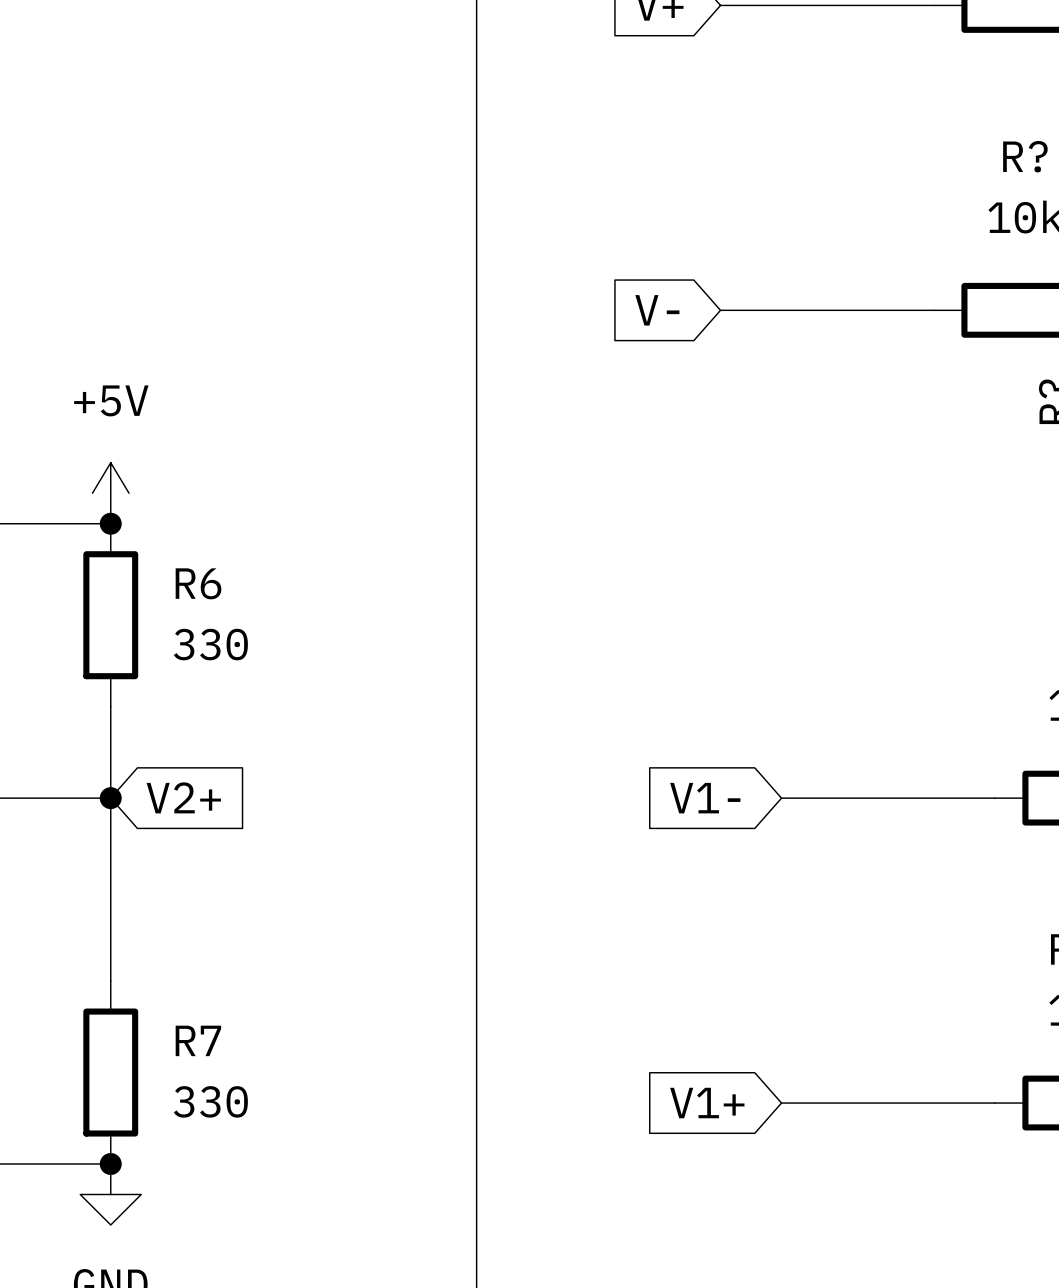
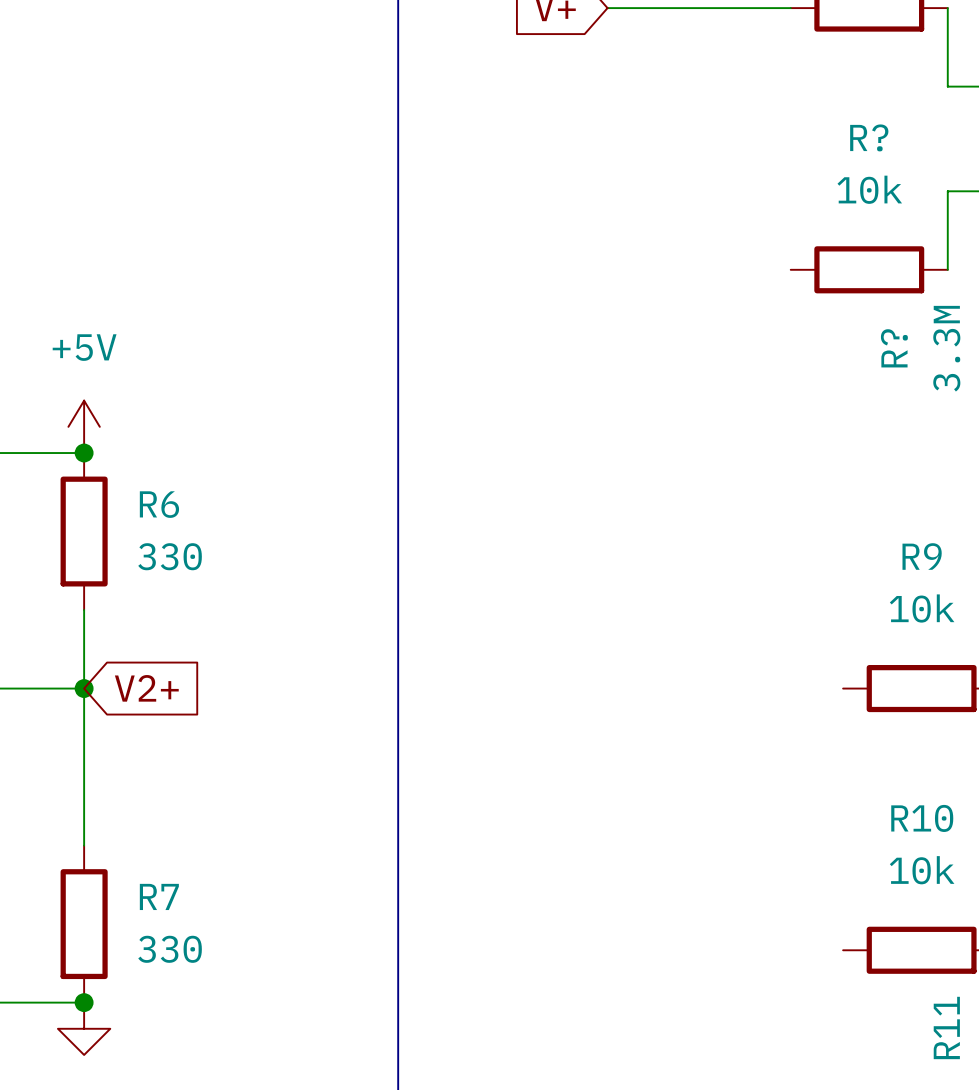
global label: V- (657, 310) -> none
wire: (720, 310) (933, 310) -> none
global label: V1- (705, 798) -> none
wire: (781, 798) (994, 798) -> none
global label: V1+ (707, 1103) -> none
wire: (781, 1103) (994, 1103) -> none

